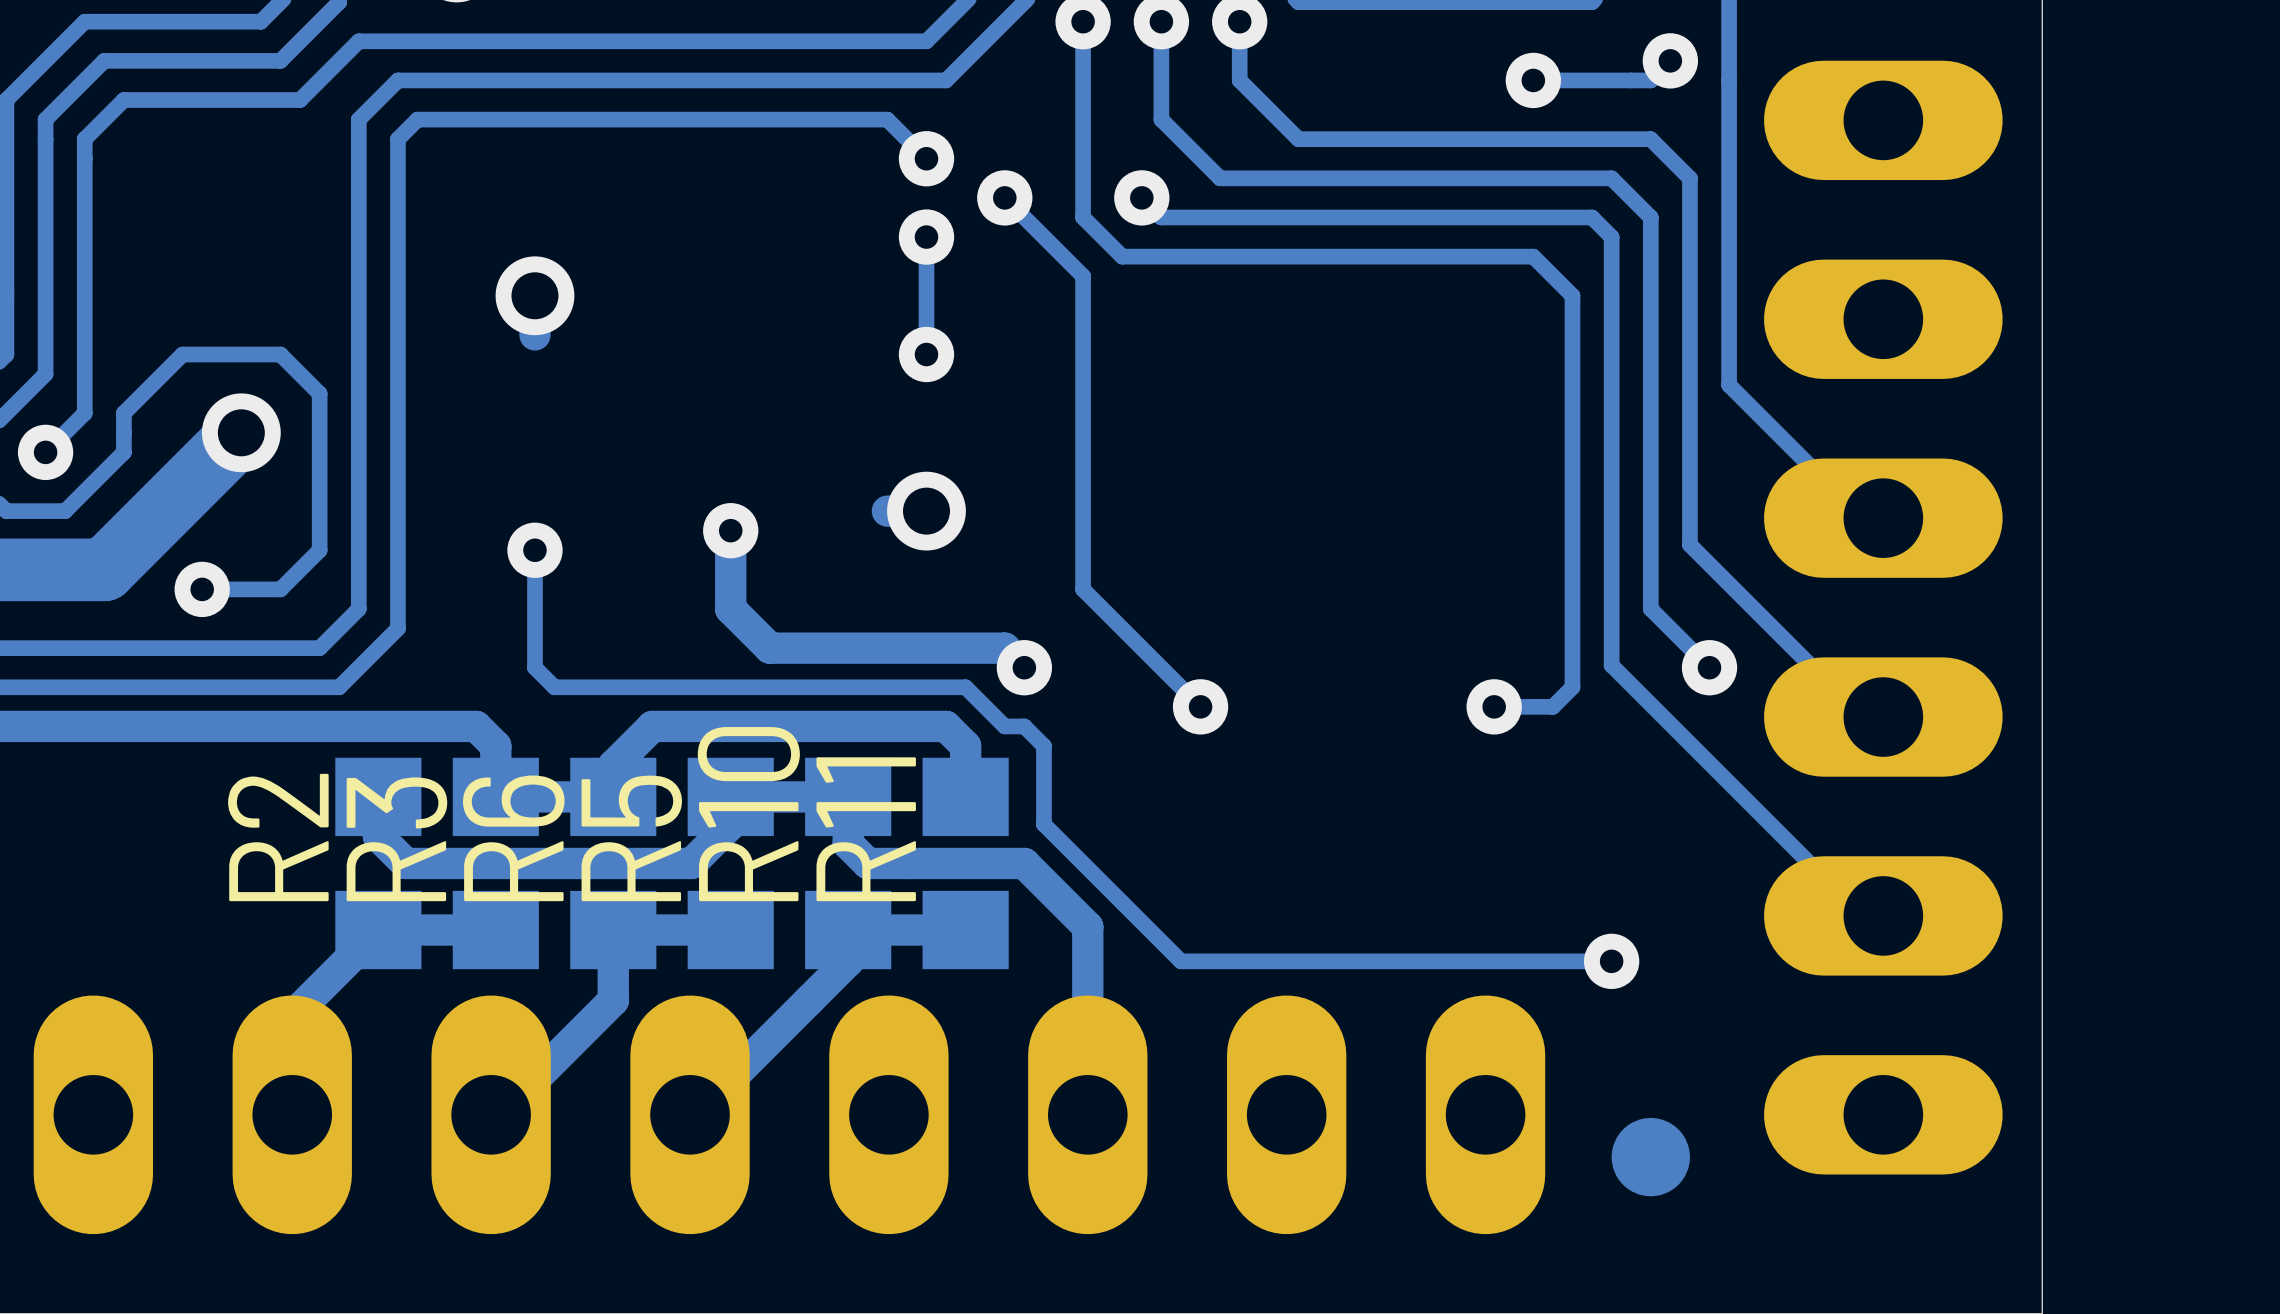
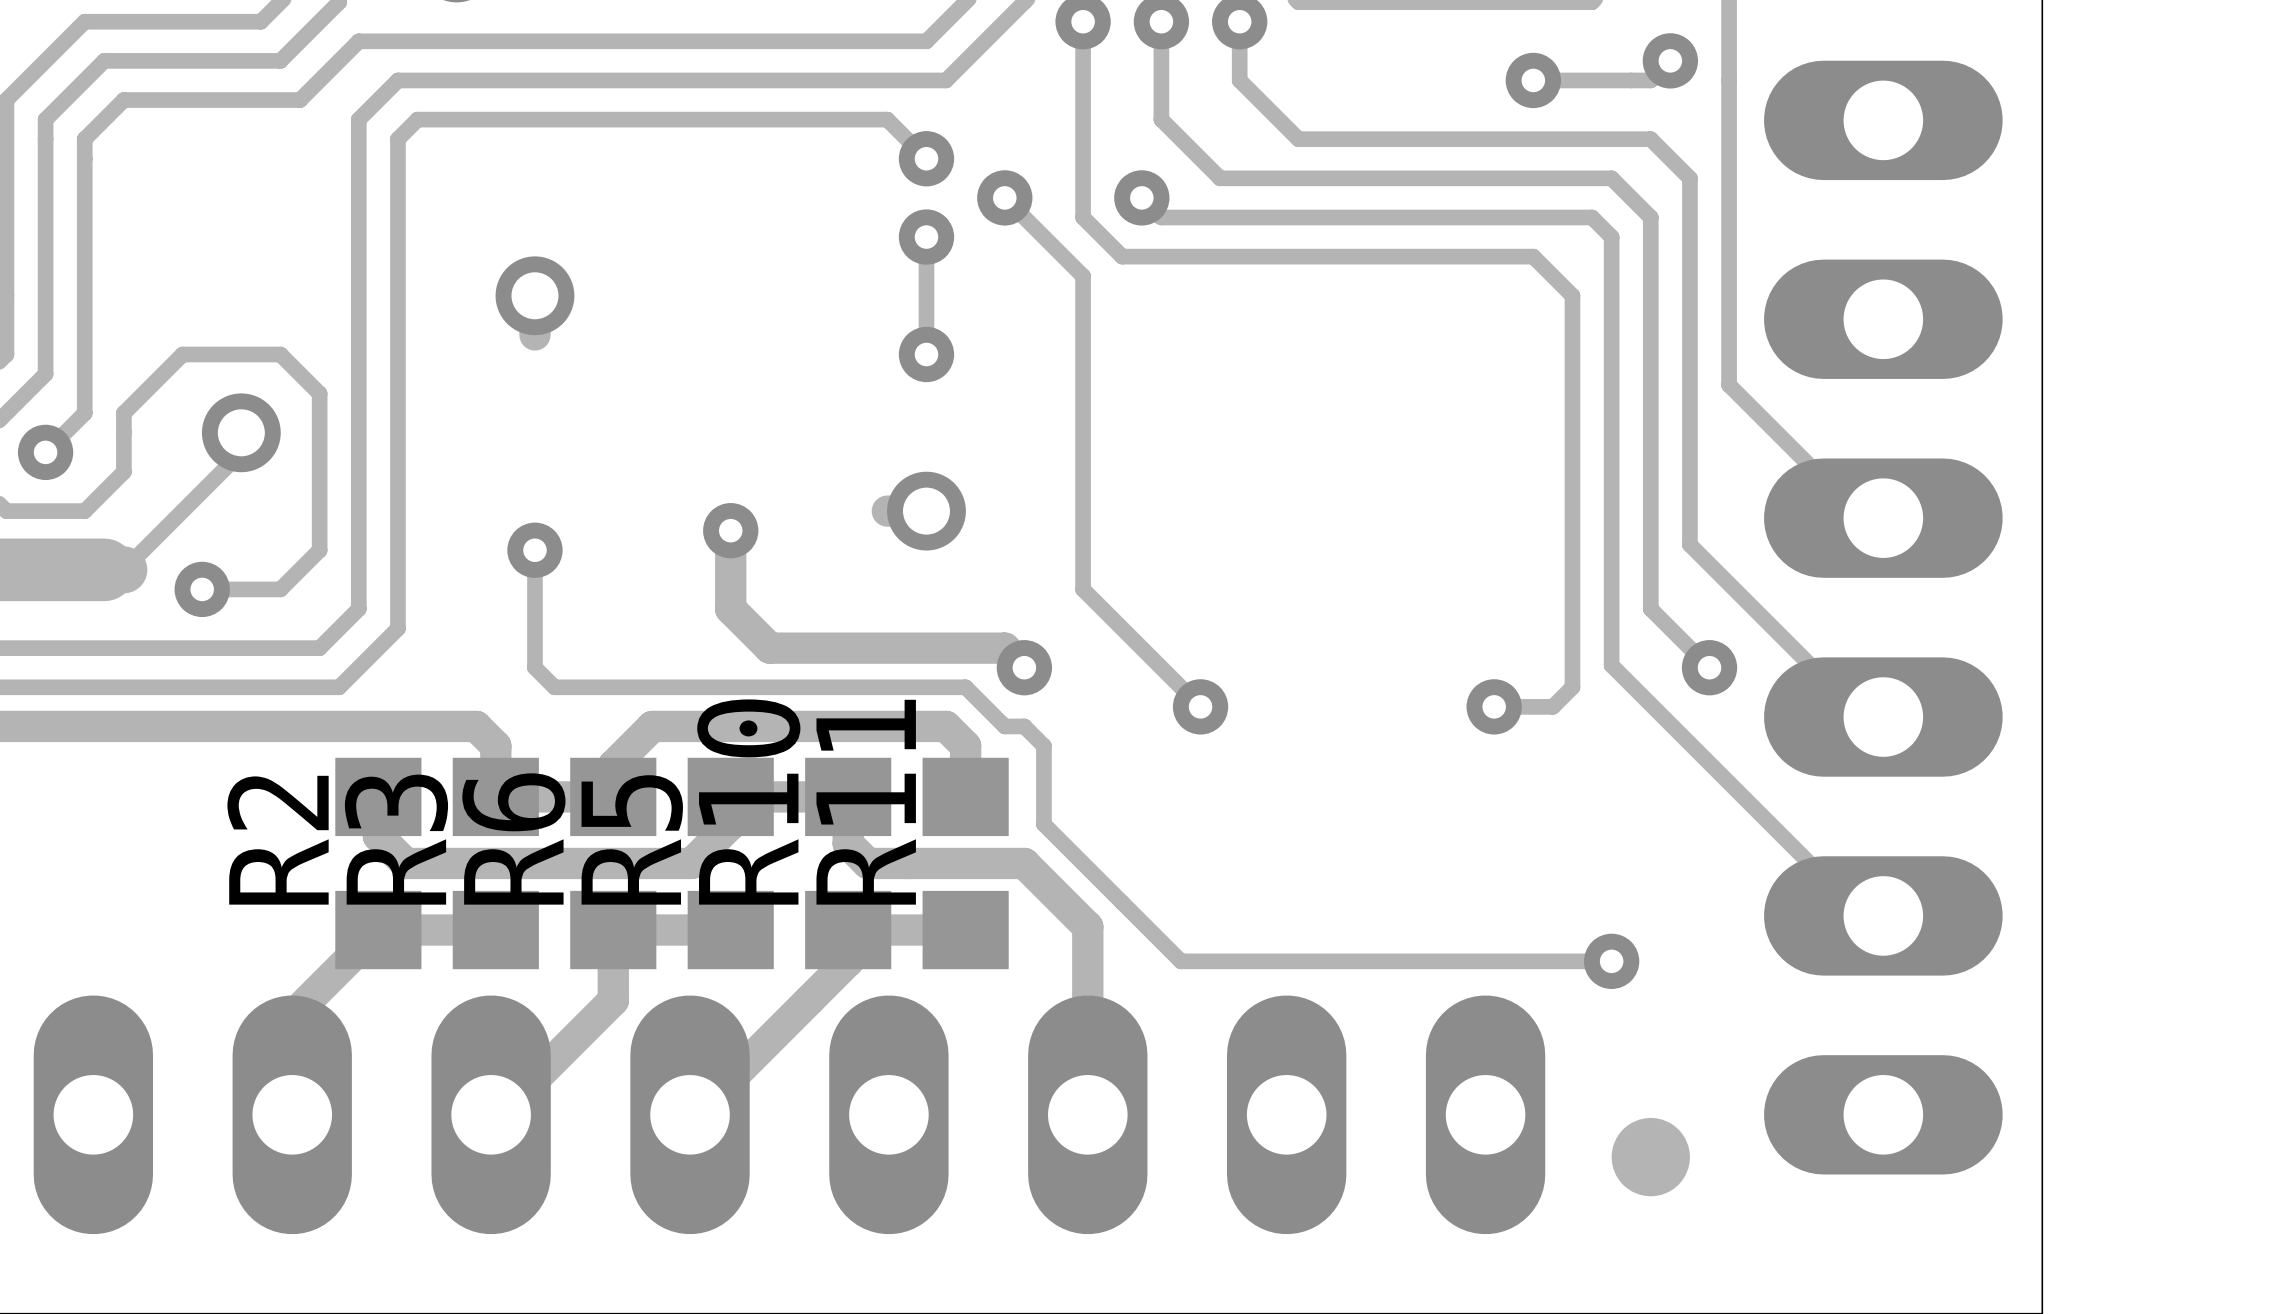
track: (241, 432) (104, 569) -> (241, 432) (241, 452) (123, 569) (104, 569)
track: (123, 452) (65, 511) -> (123, 452) (123, 471) (84, 511) (65, 511)

